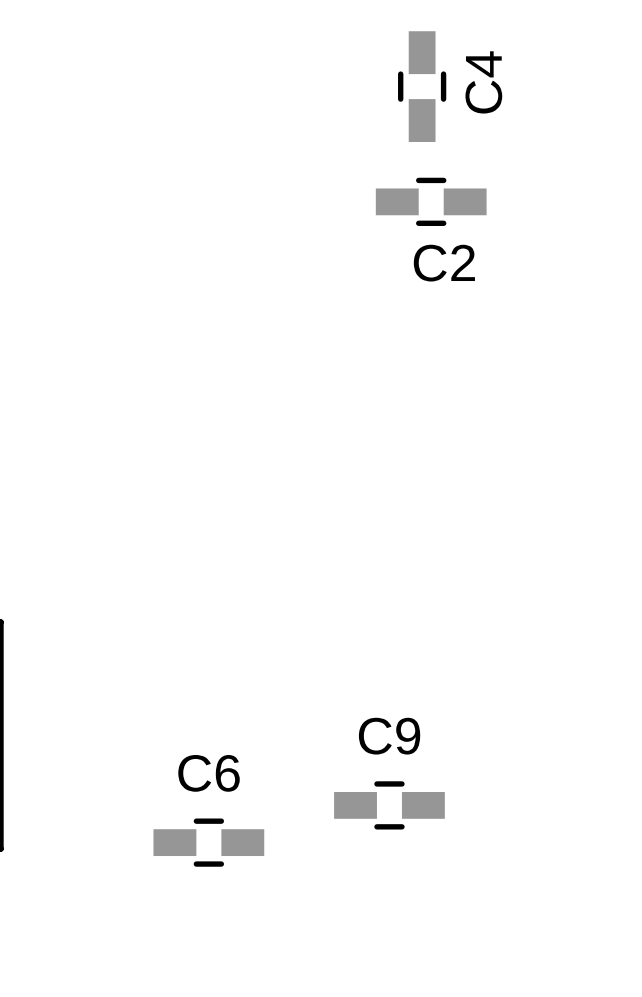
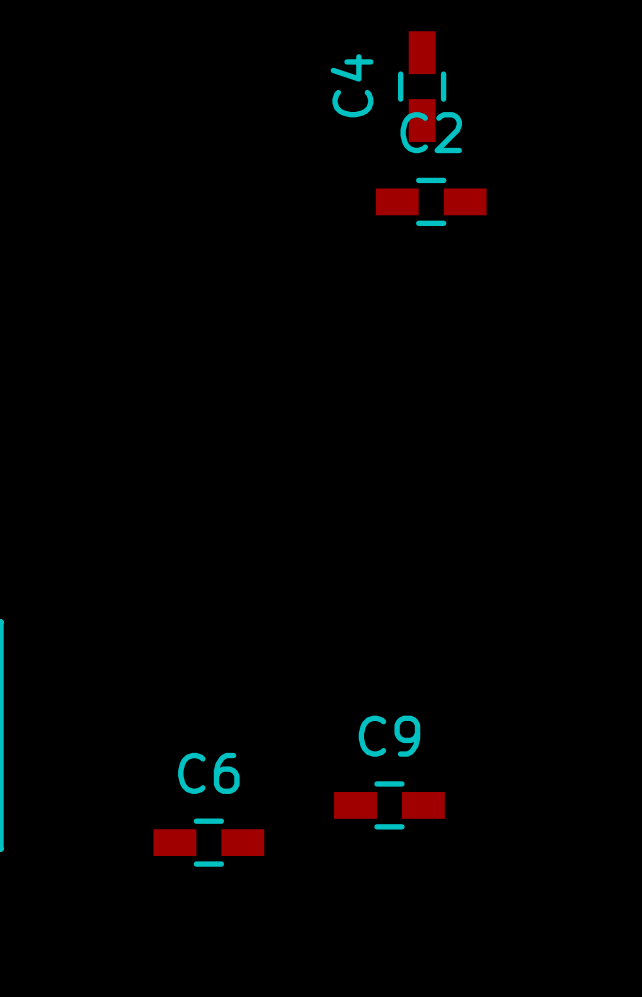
C4 name position: C4 (483, 82) -> C4 (352, 85)
C2 name position: C2 (444, 263) -> C2 (431, 132)

